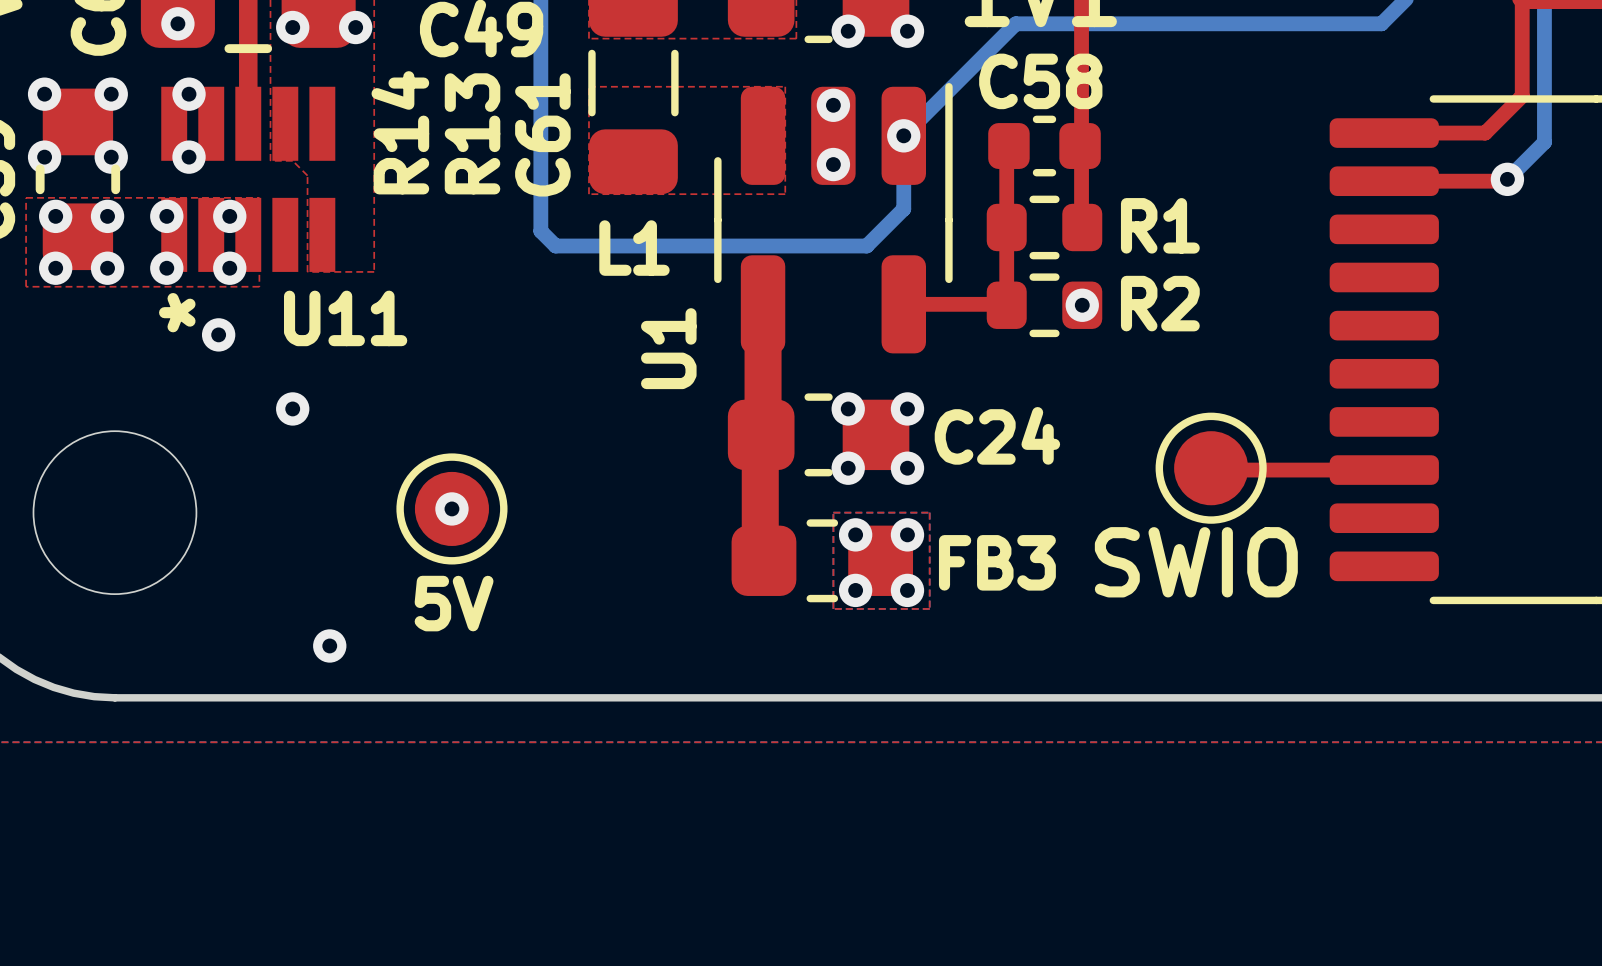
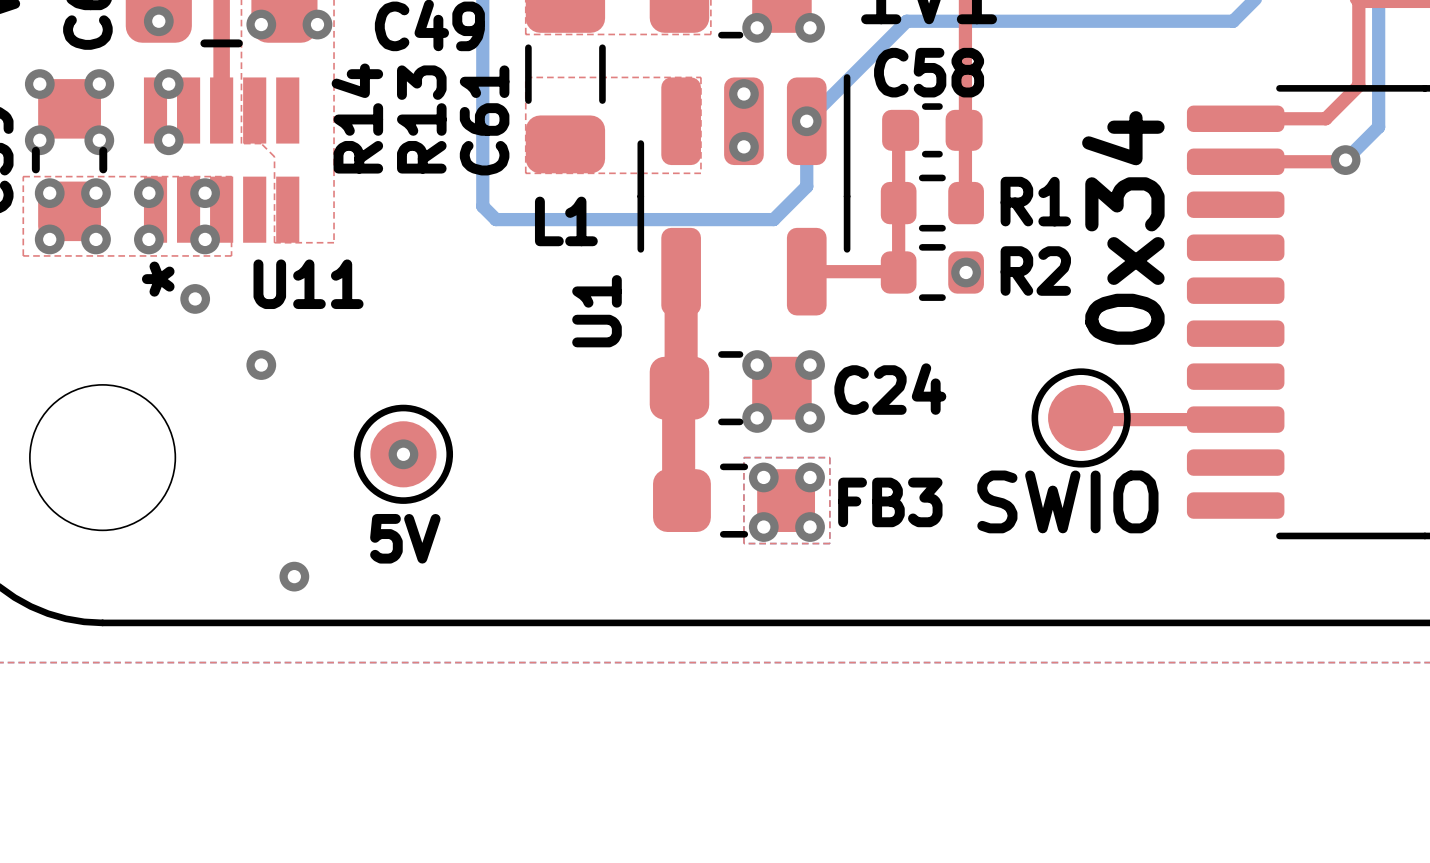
text: none -> 0x34 (1123, 227)

